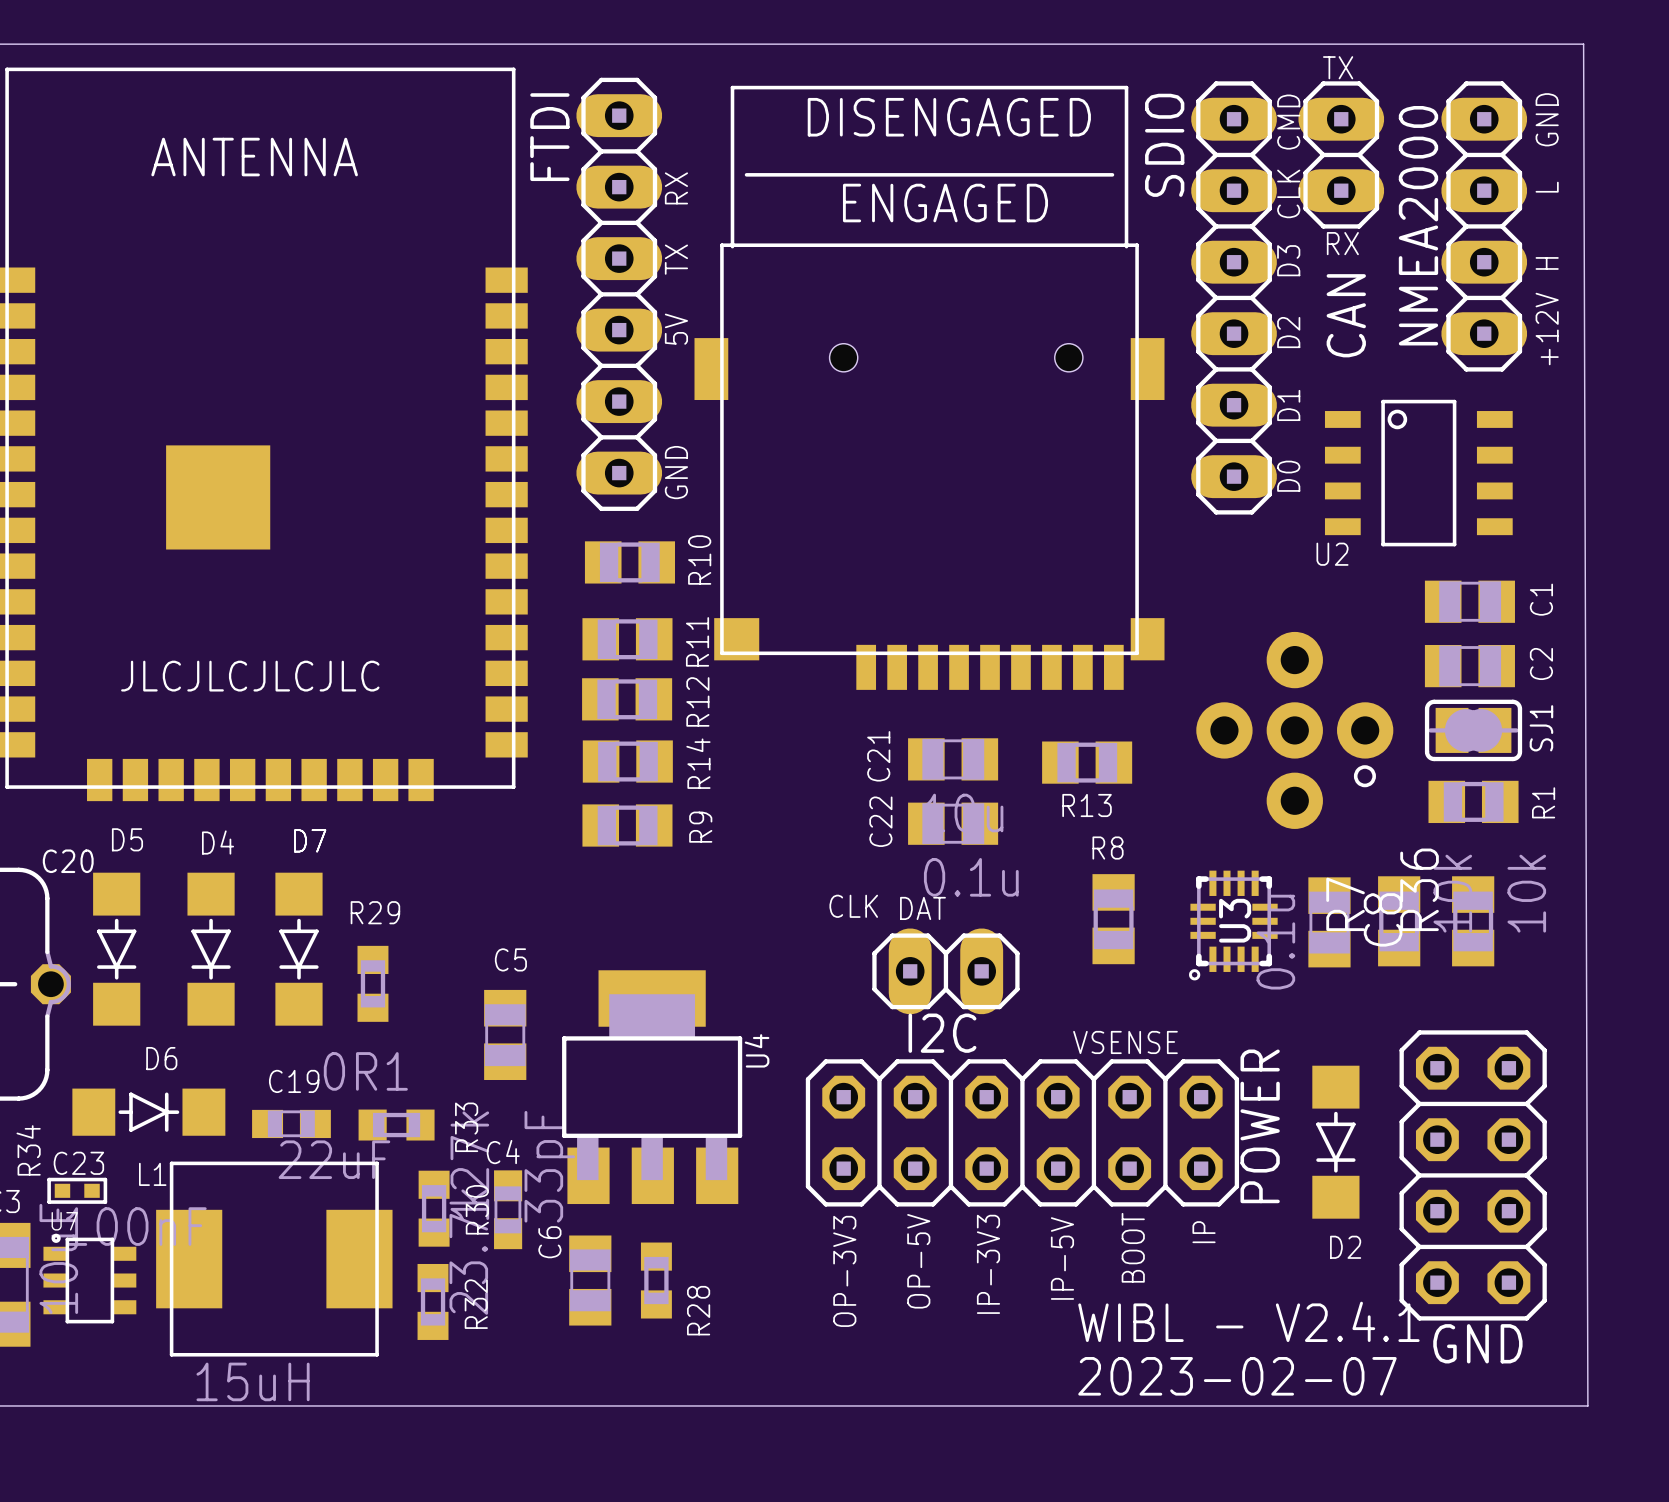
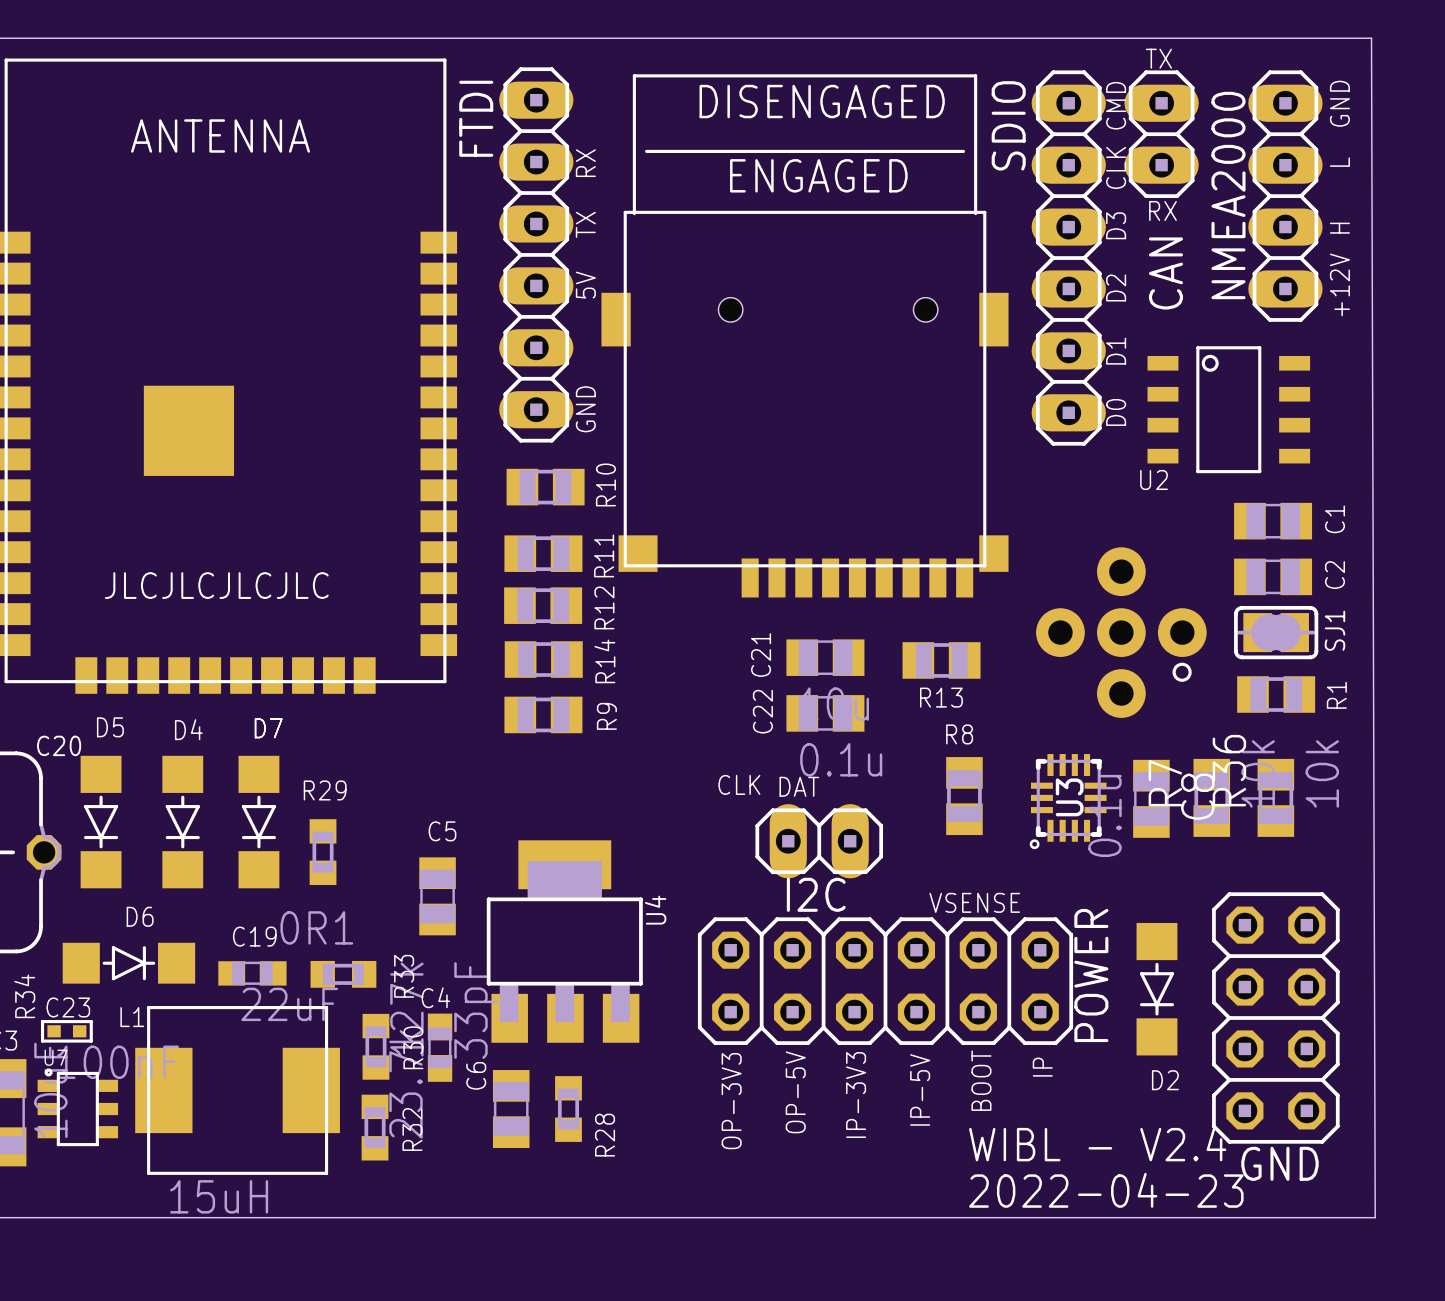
text: WIBL - V2.4.1 (1248, 1321) -> WIBL - V2.4 (1097, 1143)
text: none -> 2022-04-23 (1106, 1190)
text: 2023-02-07 (1237, 1376) -> none

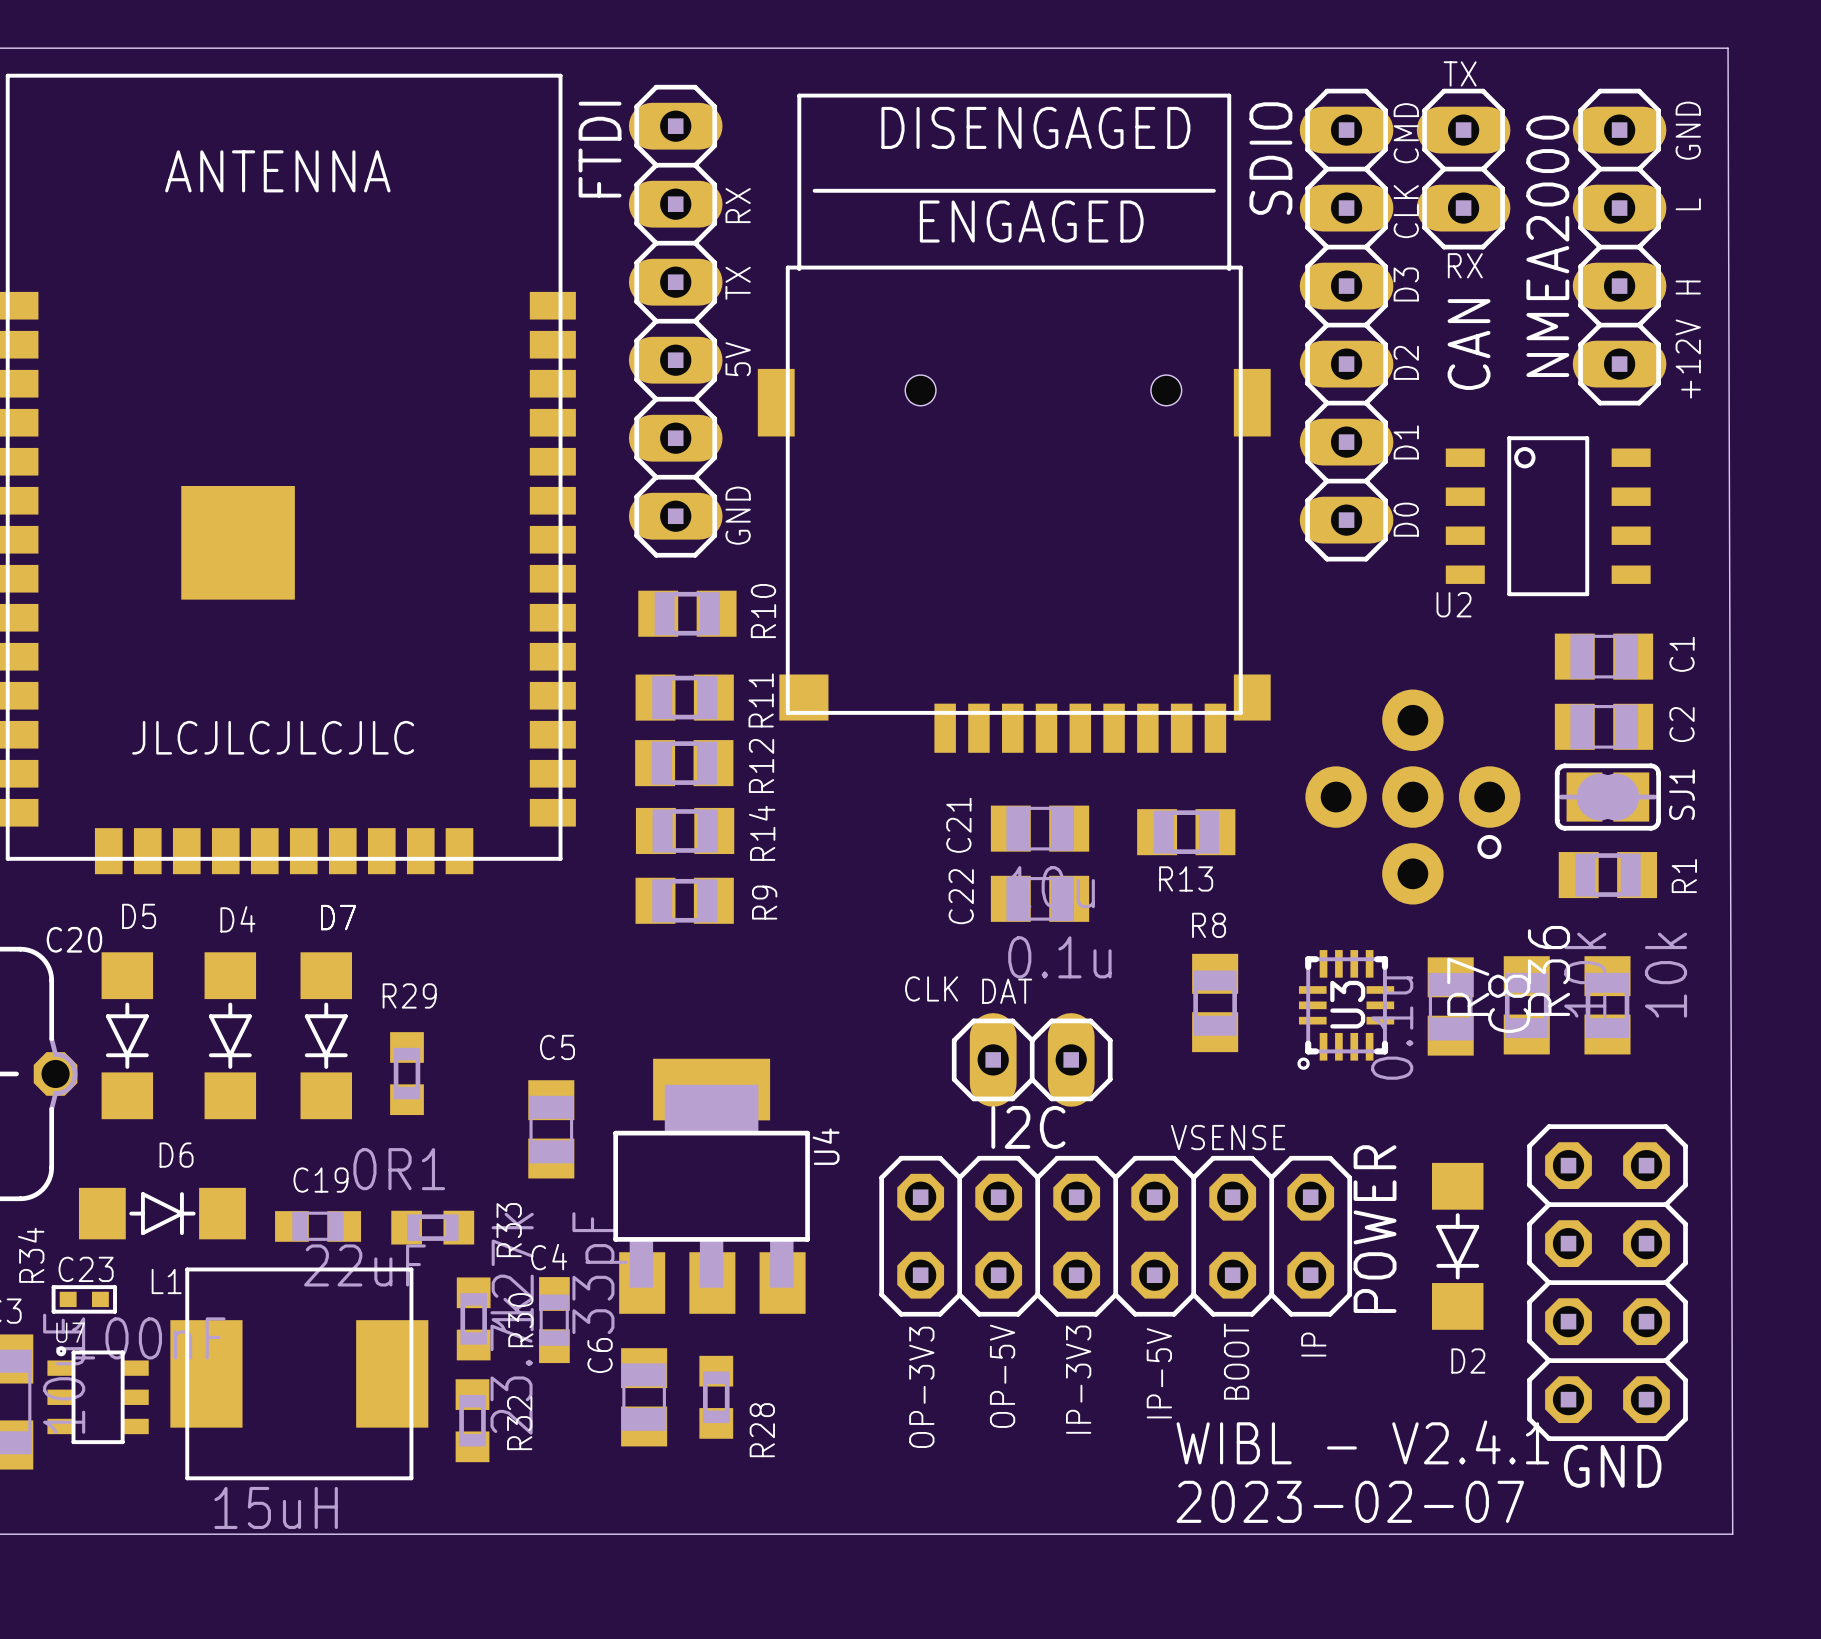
text: WIBL - V2.4 (1097, 1143) -> WIBL - V2.4.1 (1362, 1442)
text: 2022-04-23 (1106, 1190) -> none
text: none -> 2023-02-07 (1350, 1501)

